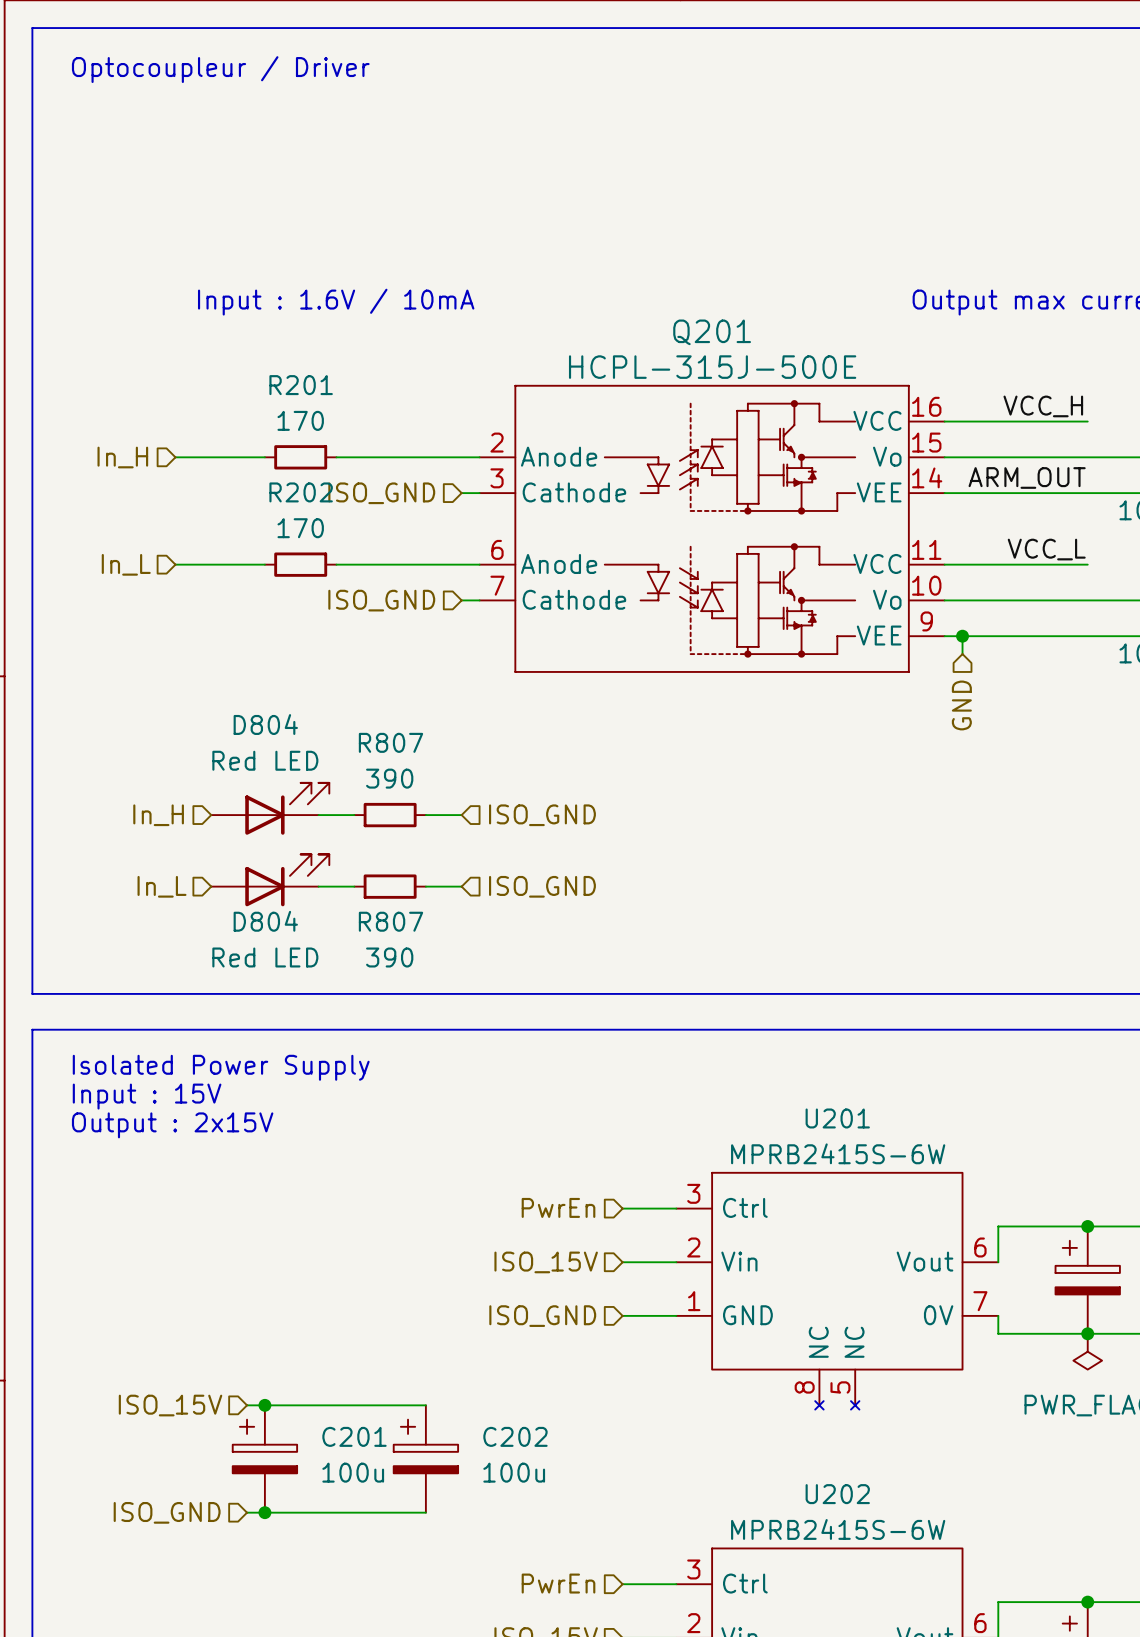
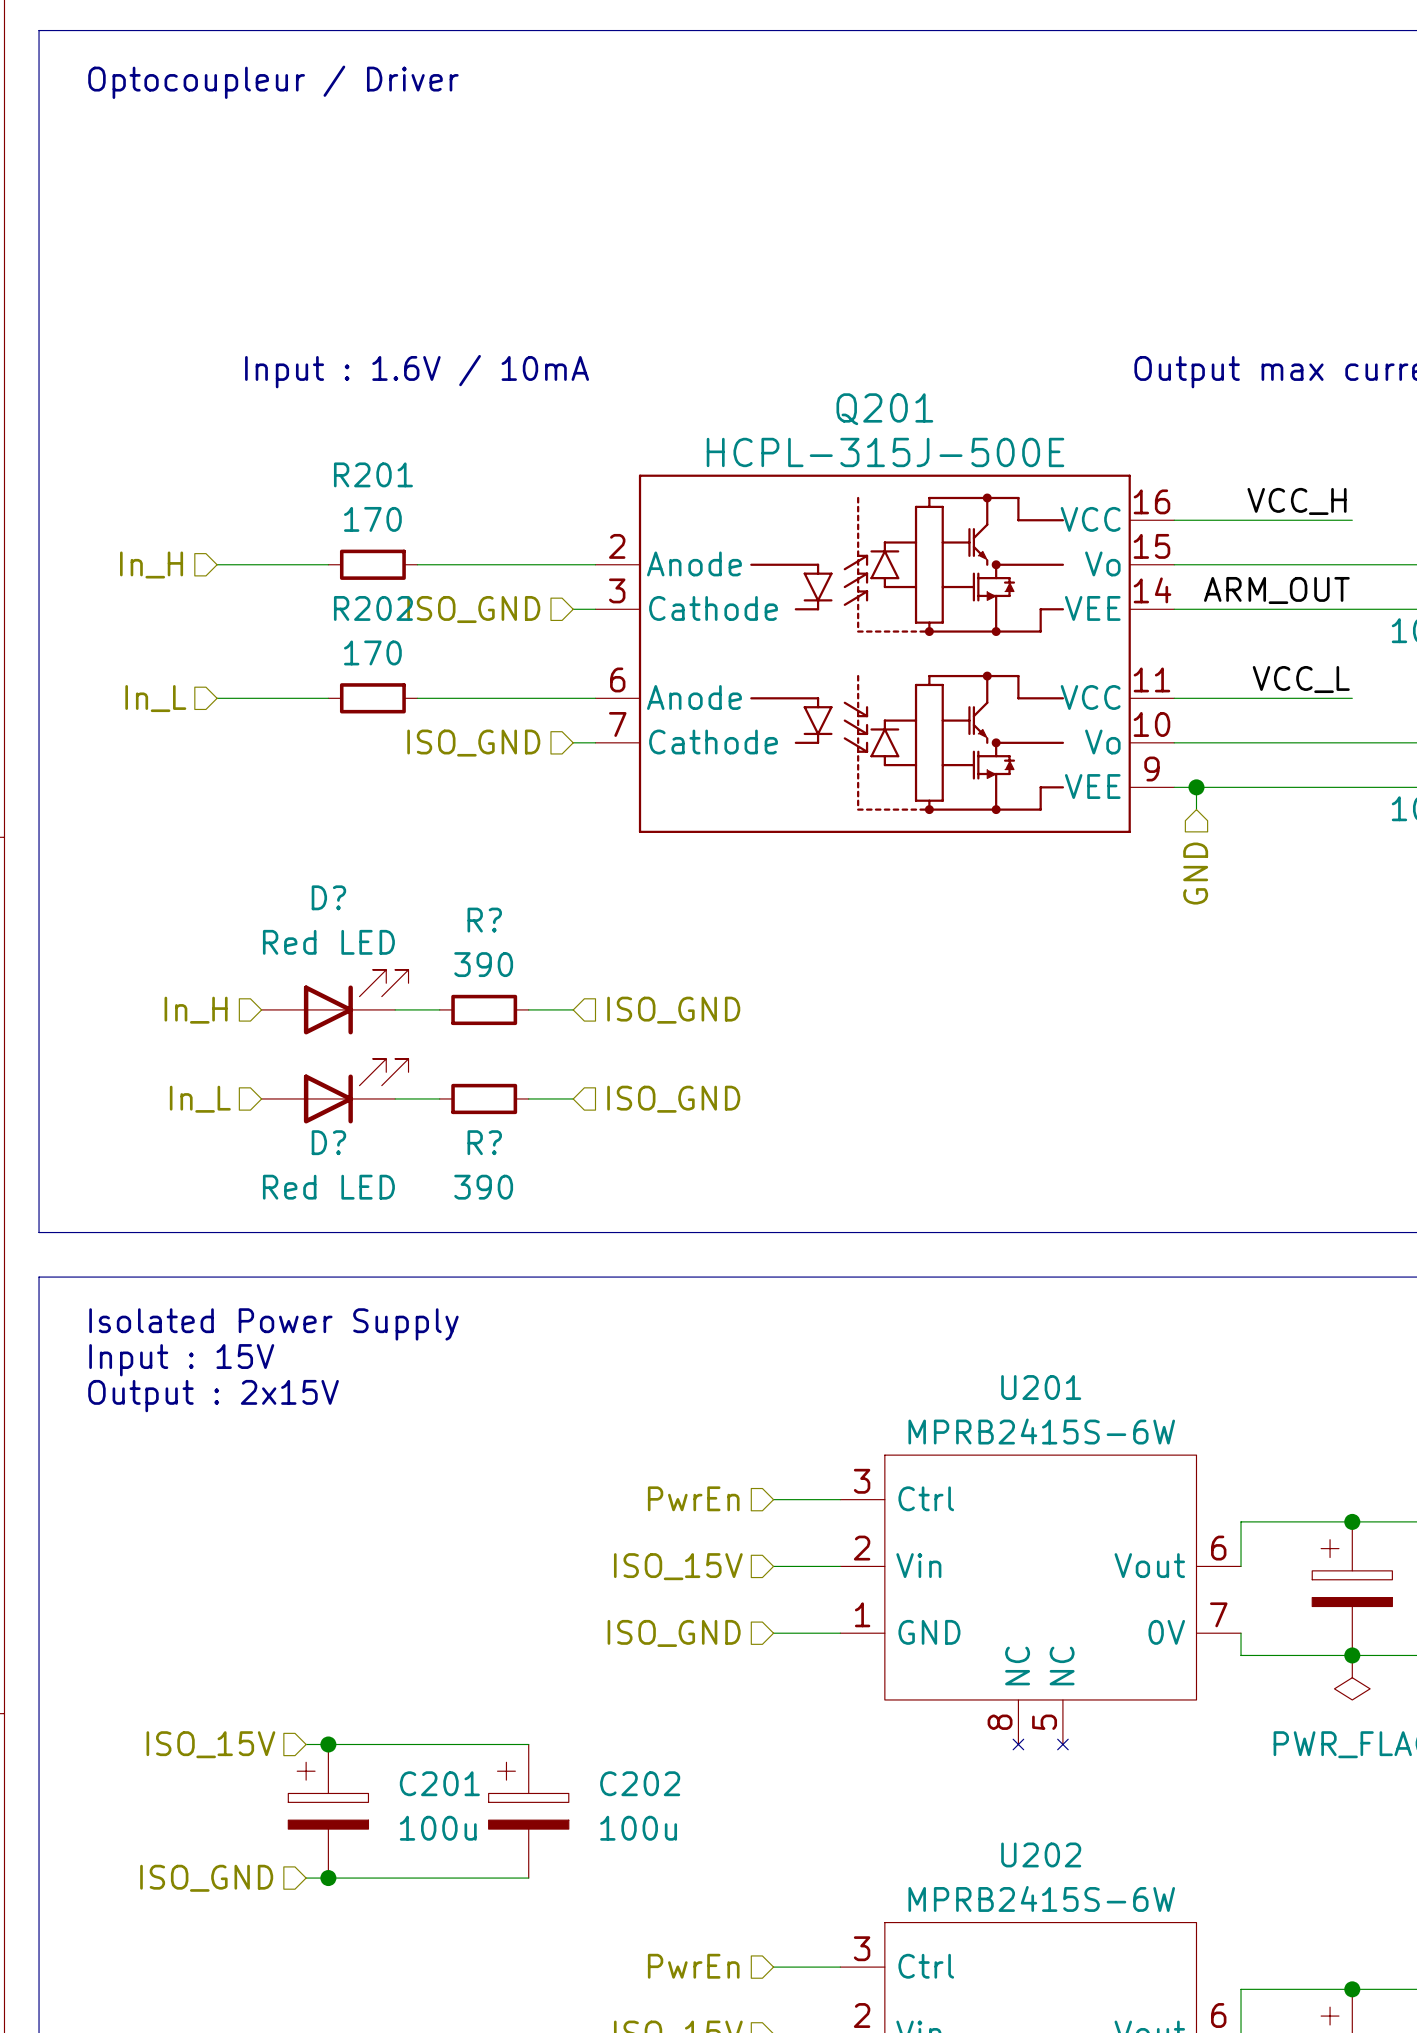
D804 name: D804 (265, 724) -> D? (328, 897)
R807 name: R807 (390, 742) -> R? (484, 920)
D804 name: D804 (265, 921) -> D? (328, 1142)
R807 name: R807 (390, 921) -> R? (484, 1142)

